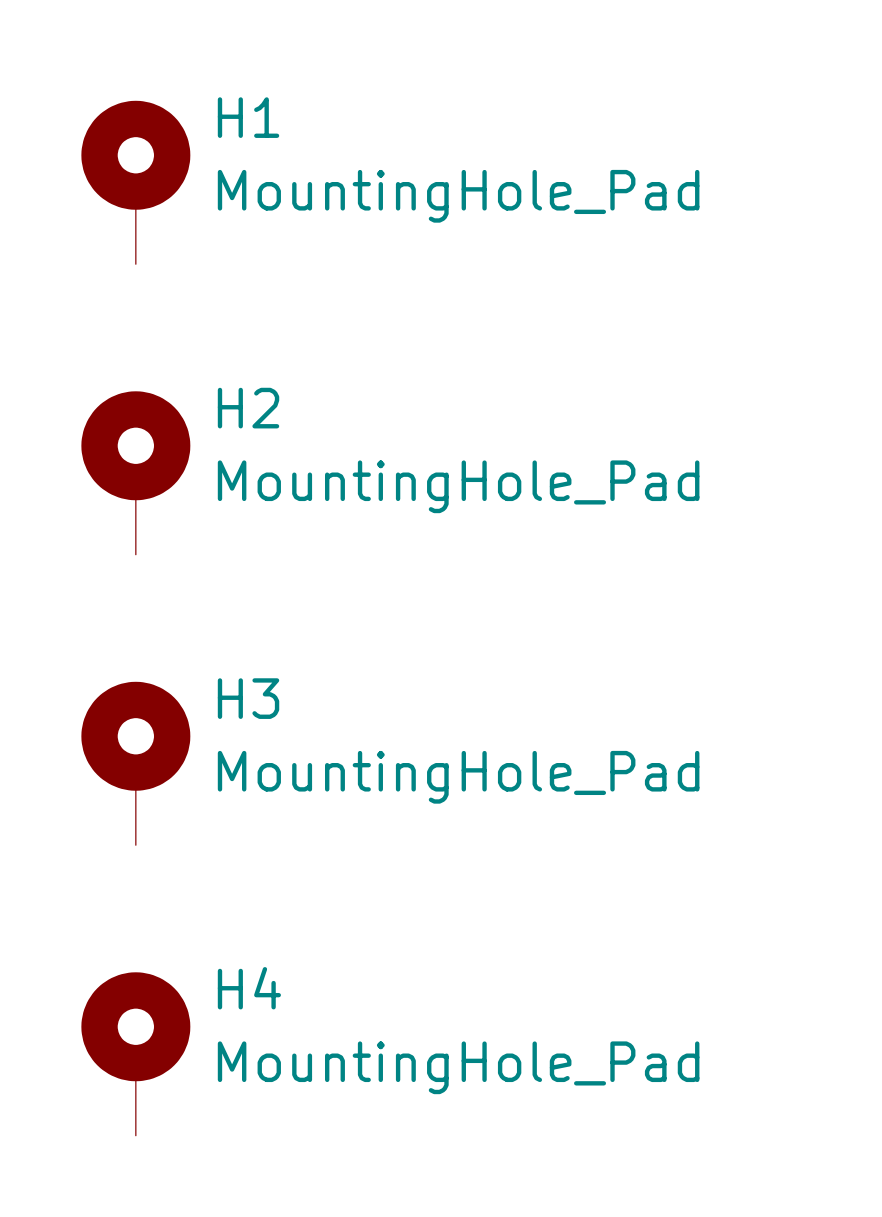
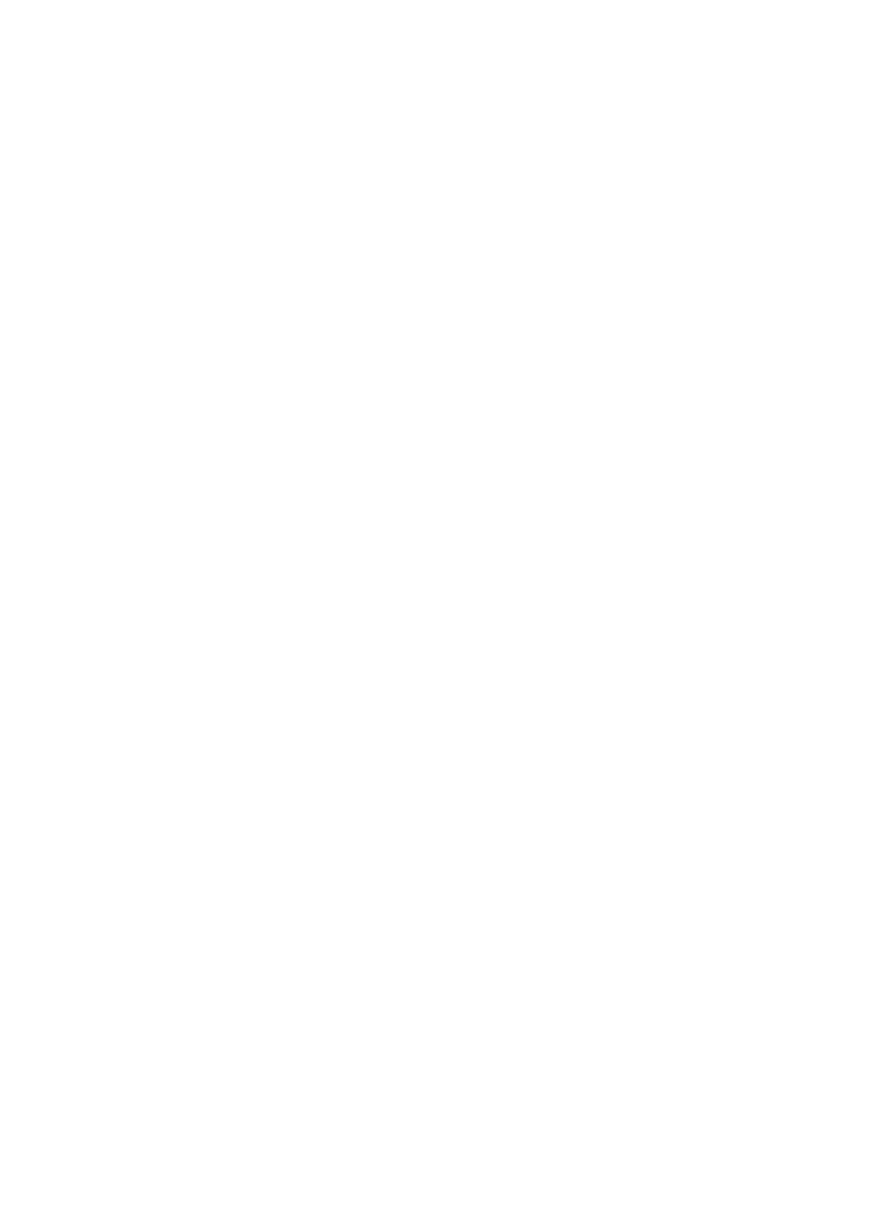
H1: MountingHole_Pad (135, 182) -> none
H2: MountingHole_Pad (135, 473) -> none
H3: MountingHole_Pad (135, 763) -> none
H4: MountingHole_Pad (135, 1054) -> none

